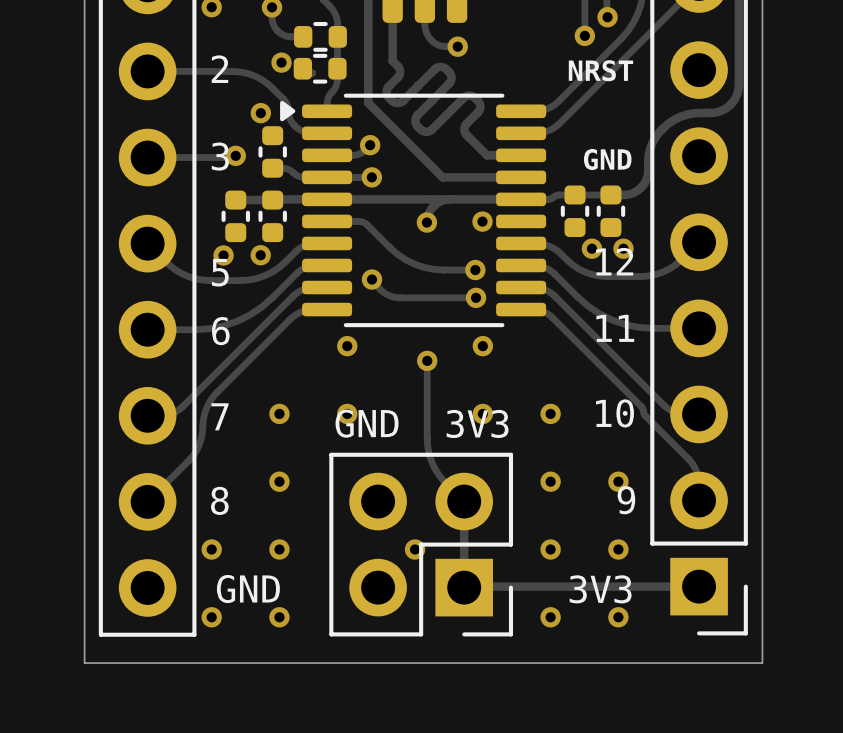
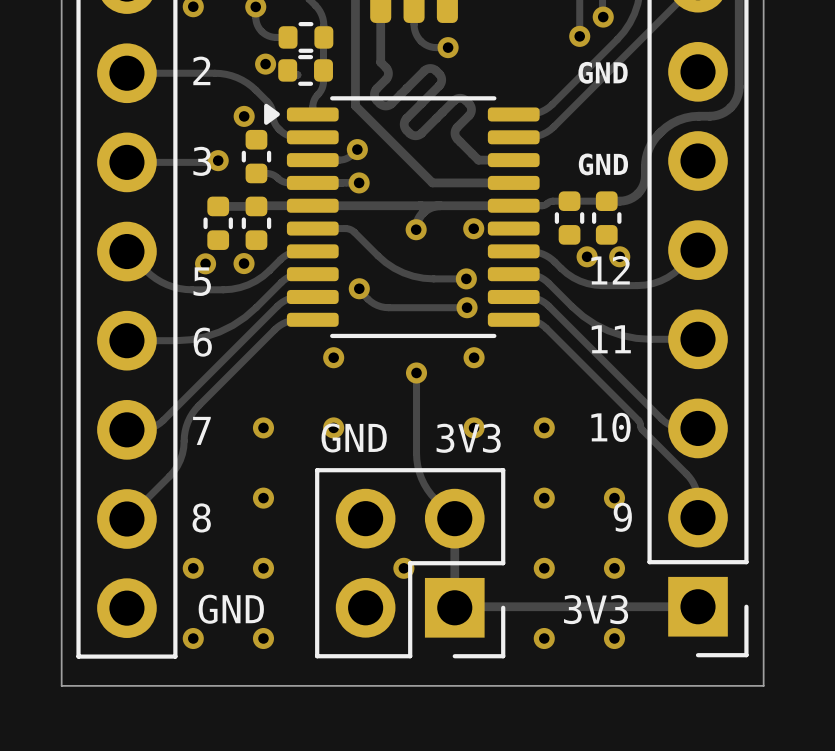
text: NRST (600, 70) -> GND (603, 72)

